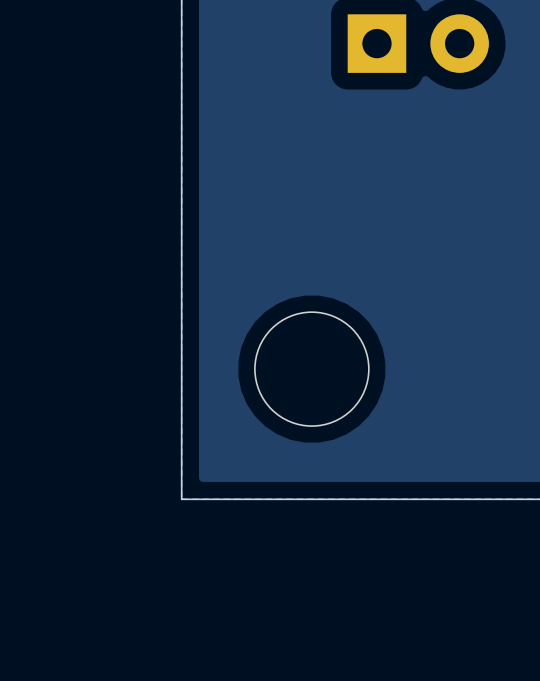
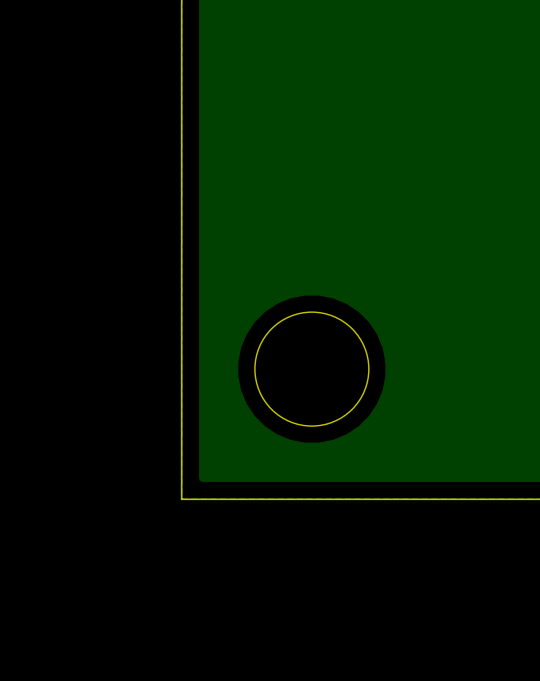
part: (418, 43) -> none

